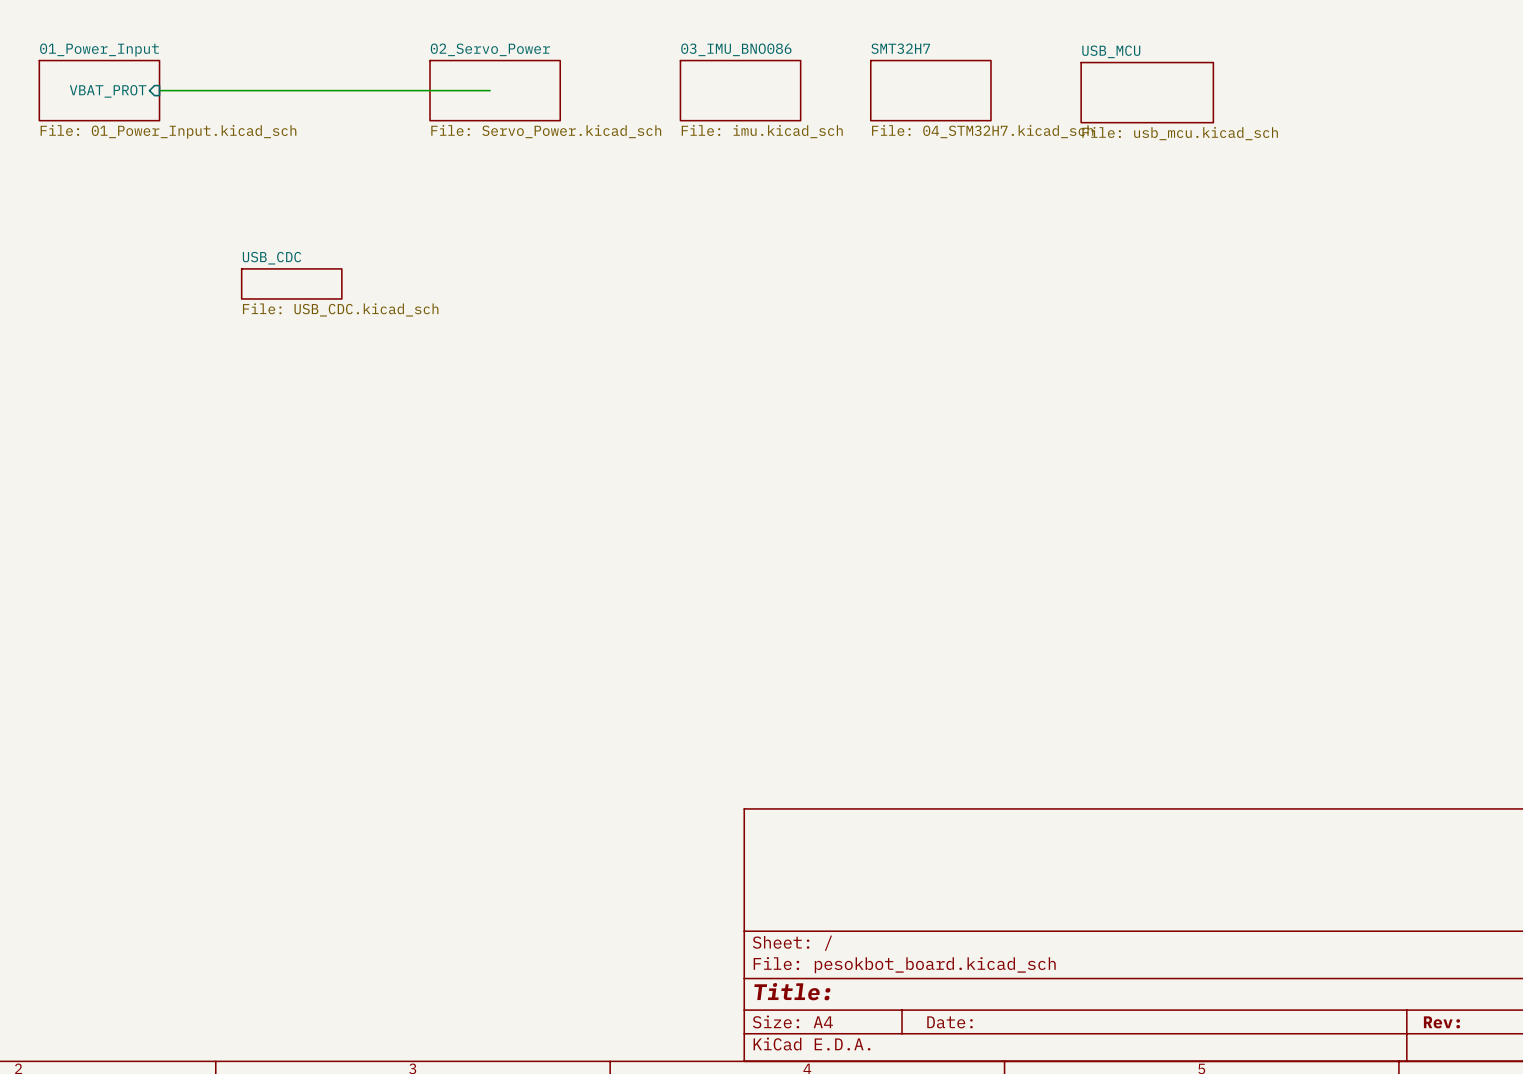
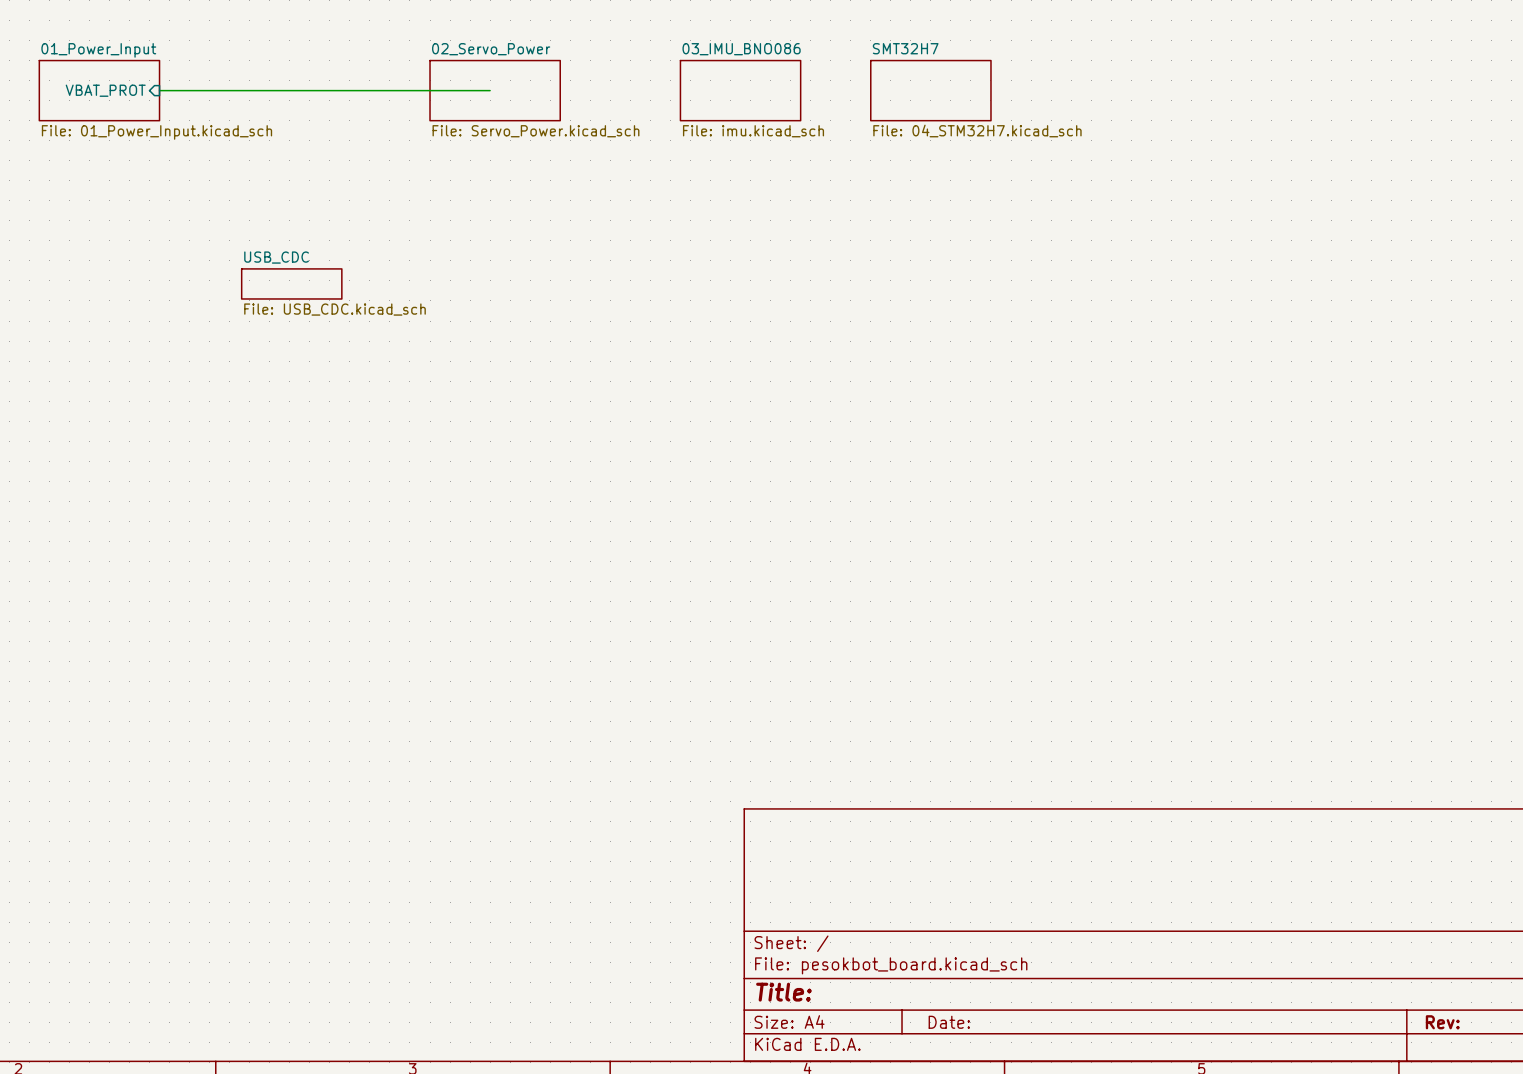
sheet USB_MCU: File: usb_mcu.kicad_sch (1147, 92) -> none

